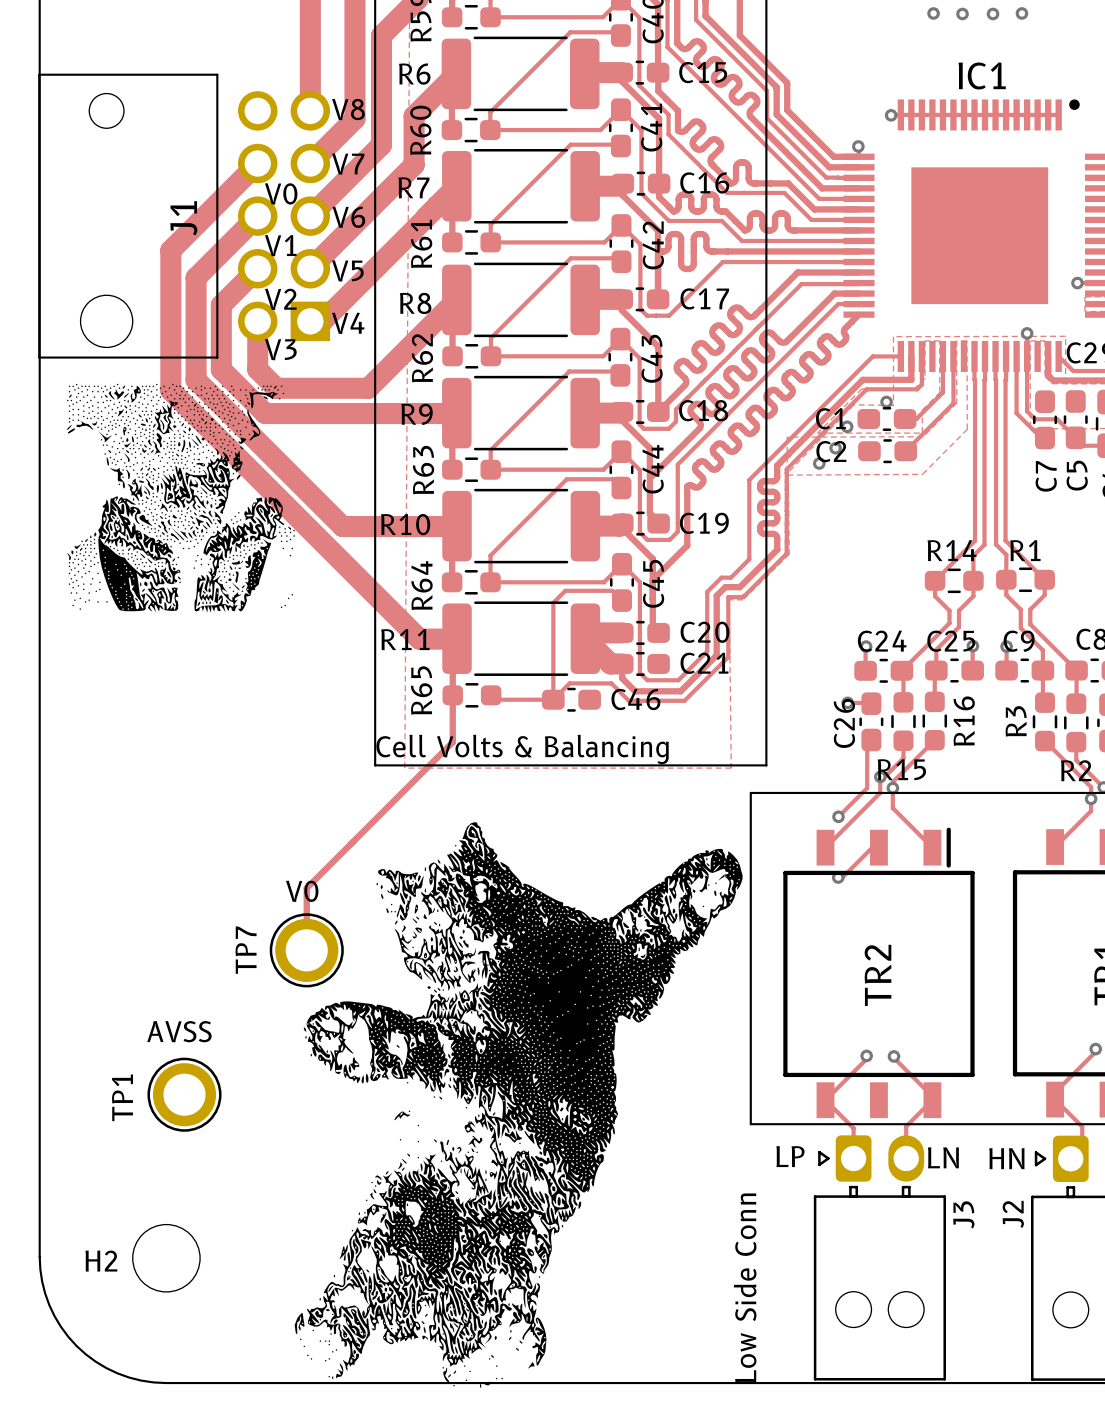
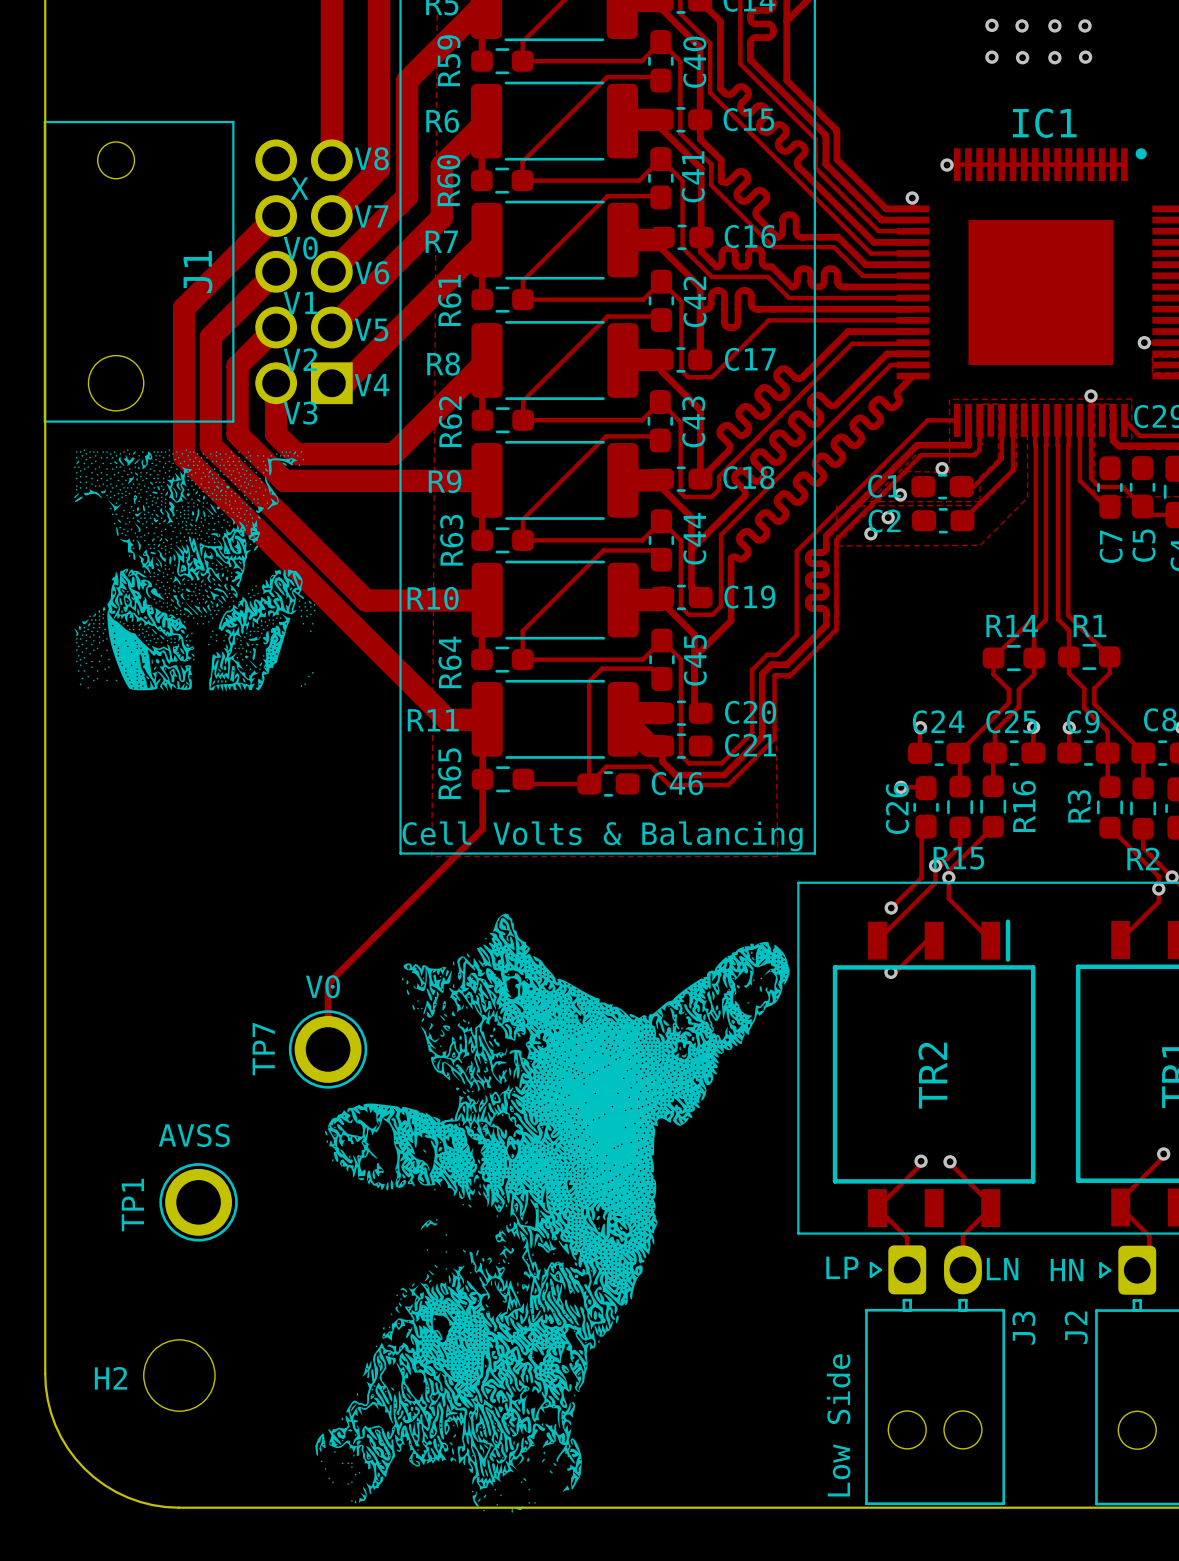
text: none -> X (299, 188)
text: Low Side Conn (745, 1287) -> Low Side (838, 1425)

